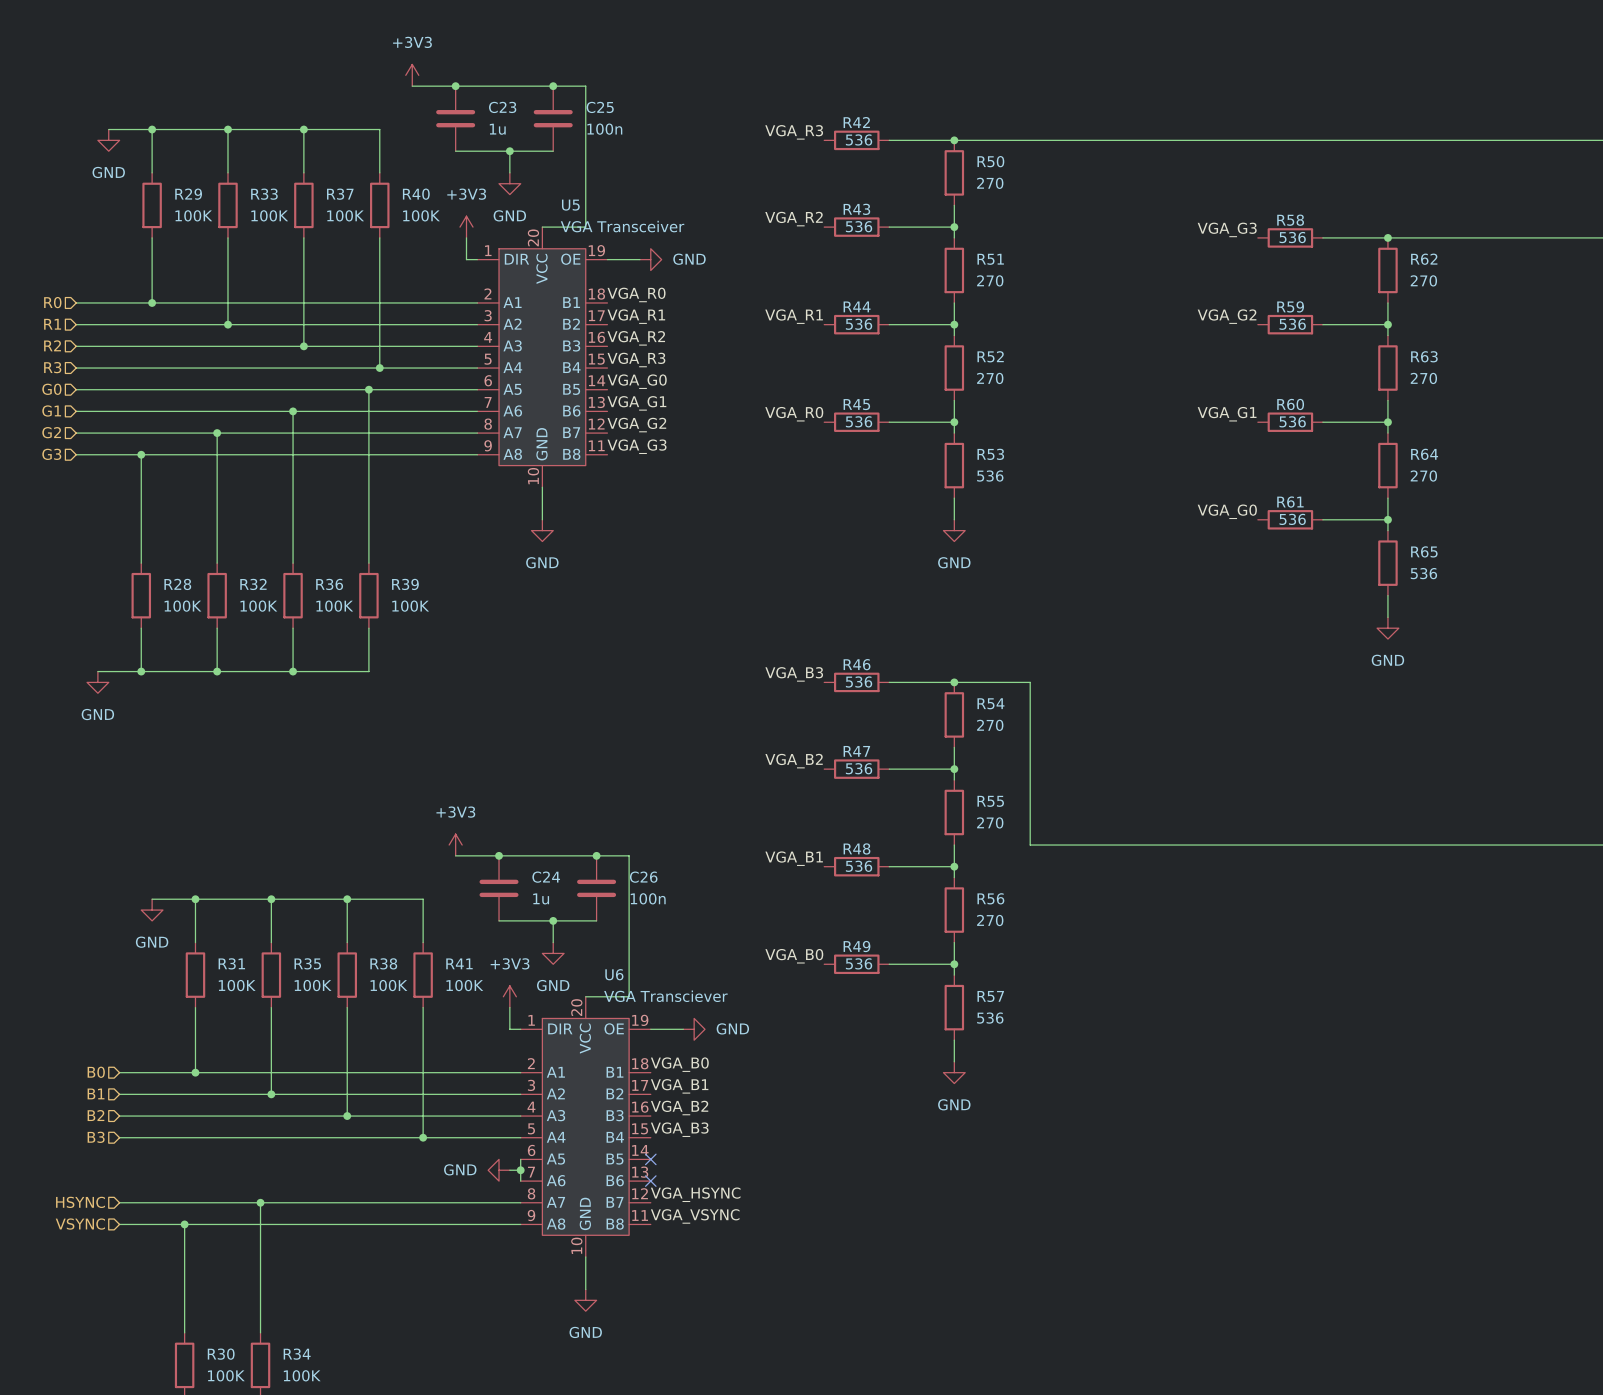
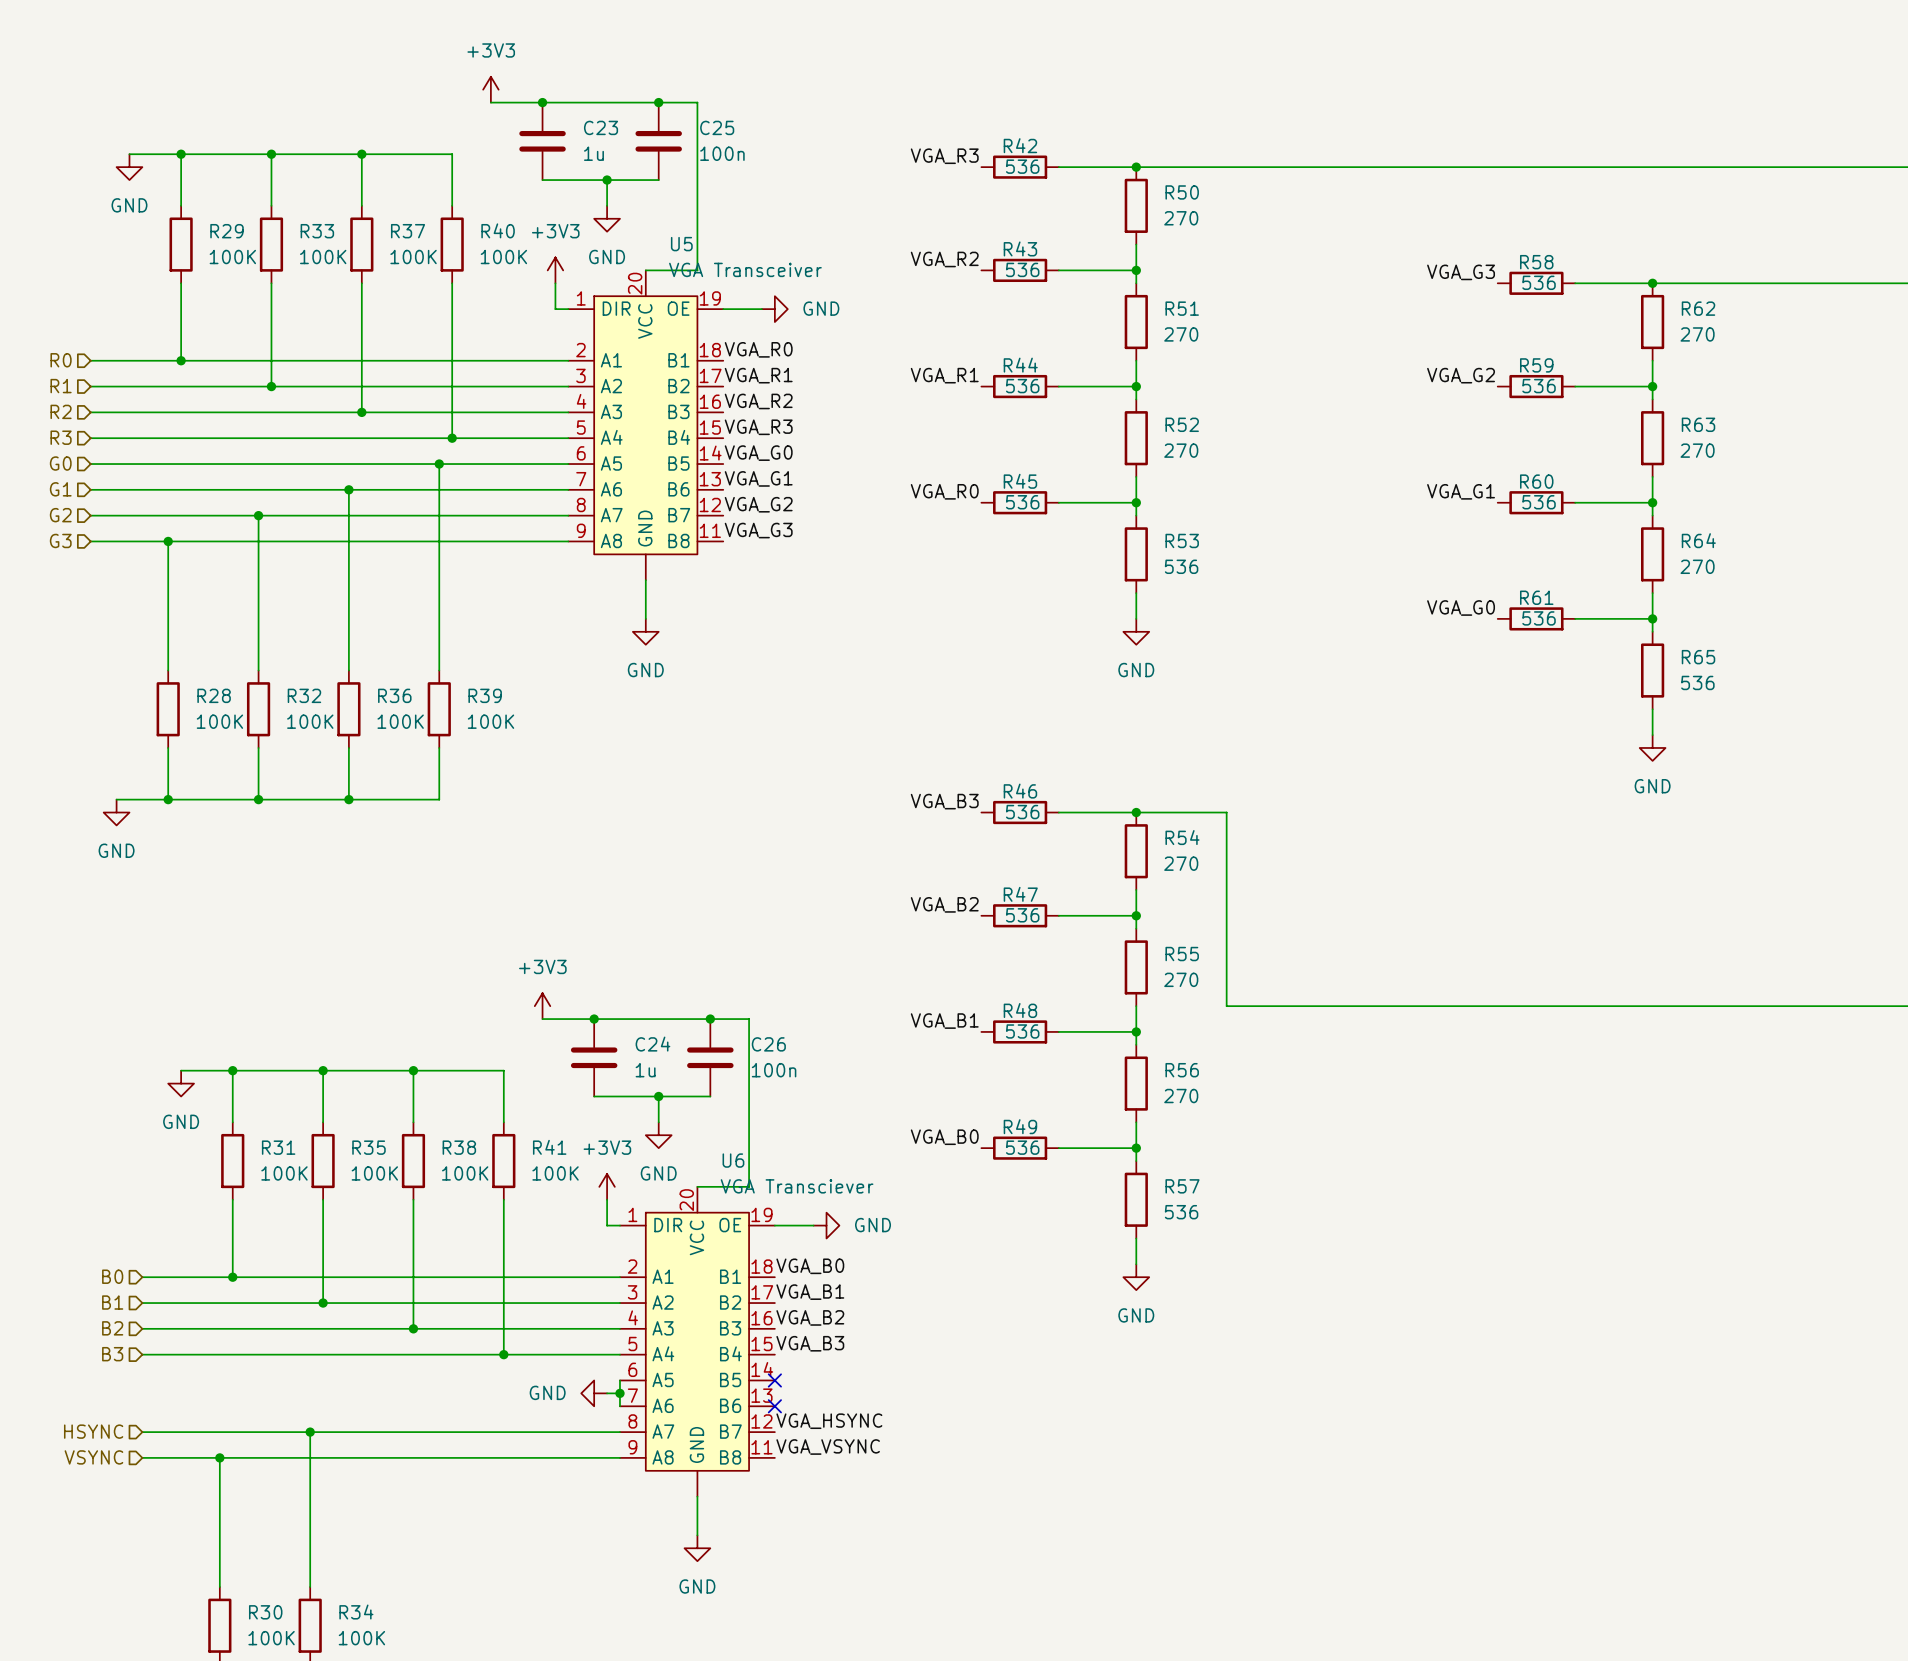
U5 pin number: 10 (533, 476) -> none
U6 pin number: 10 (576, 1245) -> none

